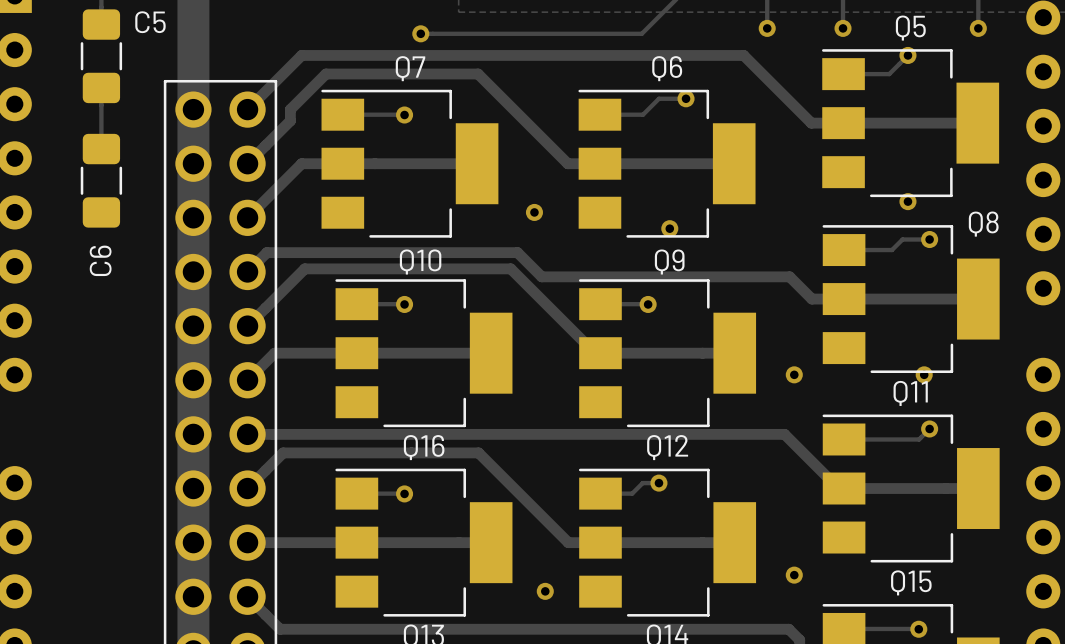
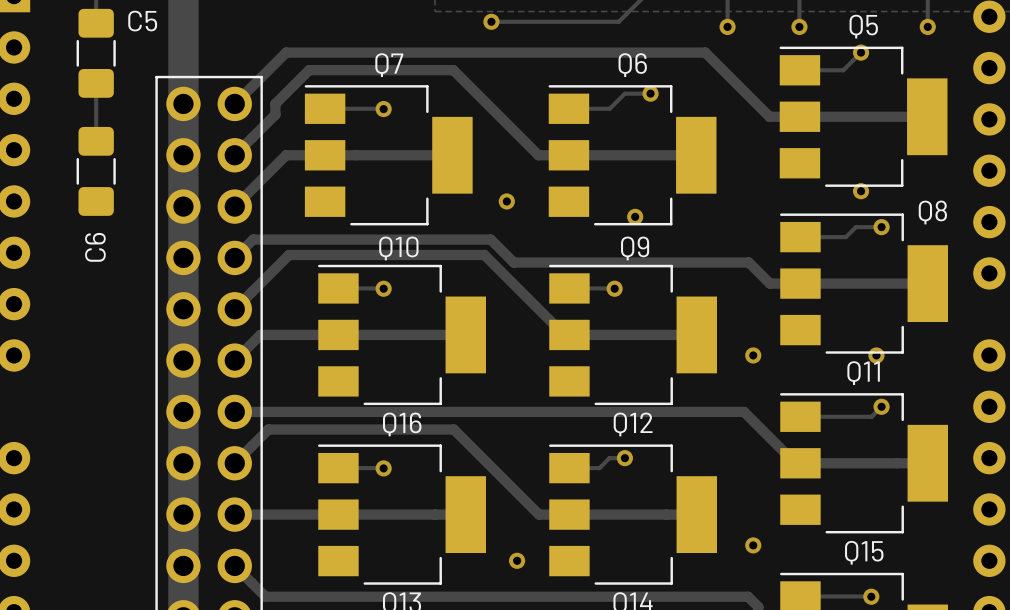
via: none -> (491, 21)
track: (652, 22) (641, 33) (420, 33) -> (618, 21) (491, 21)
via: (420, 33) -> none

